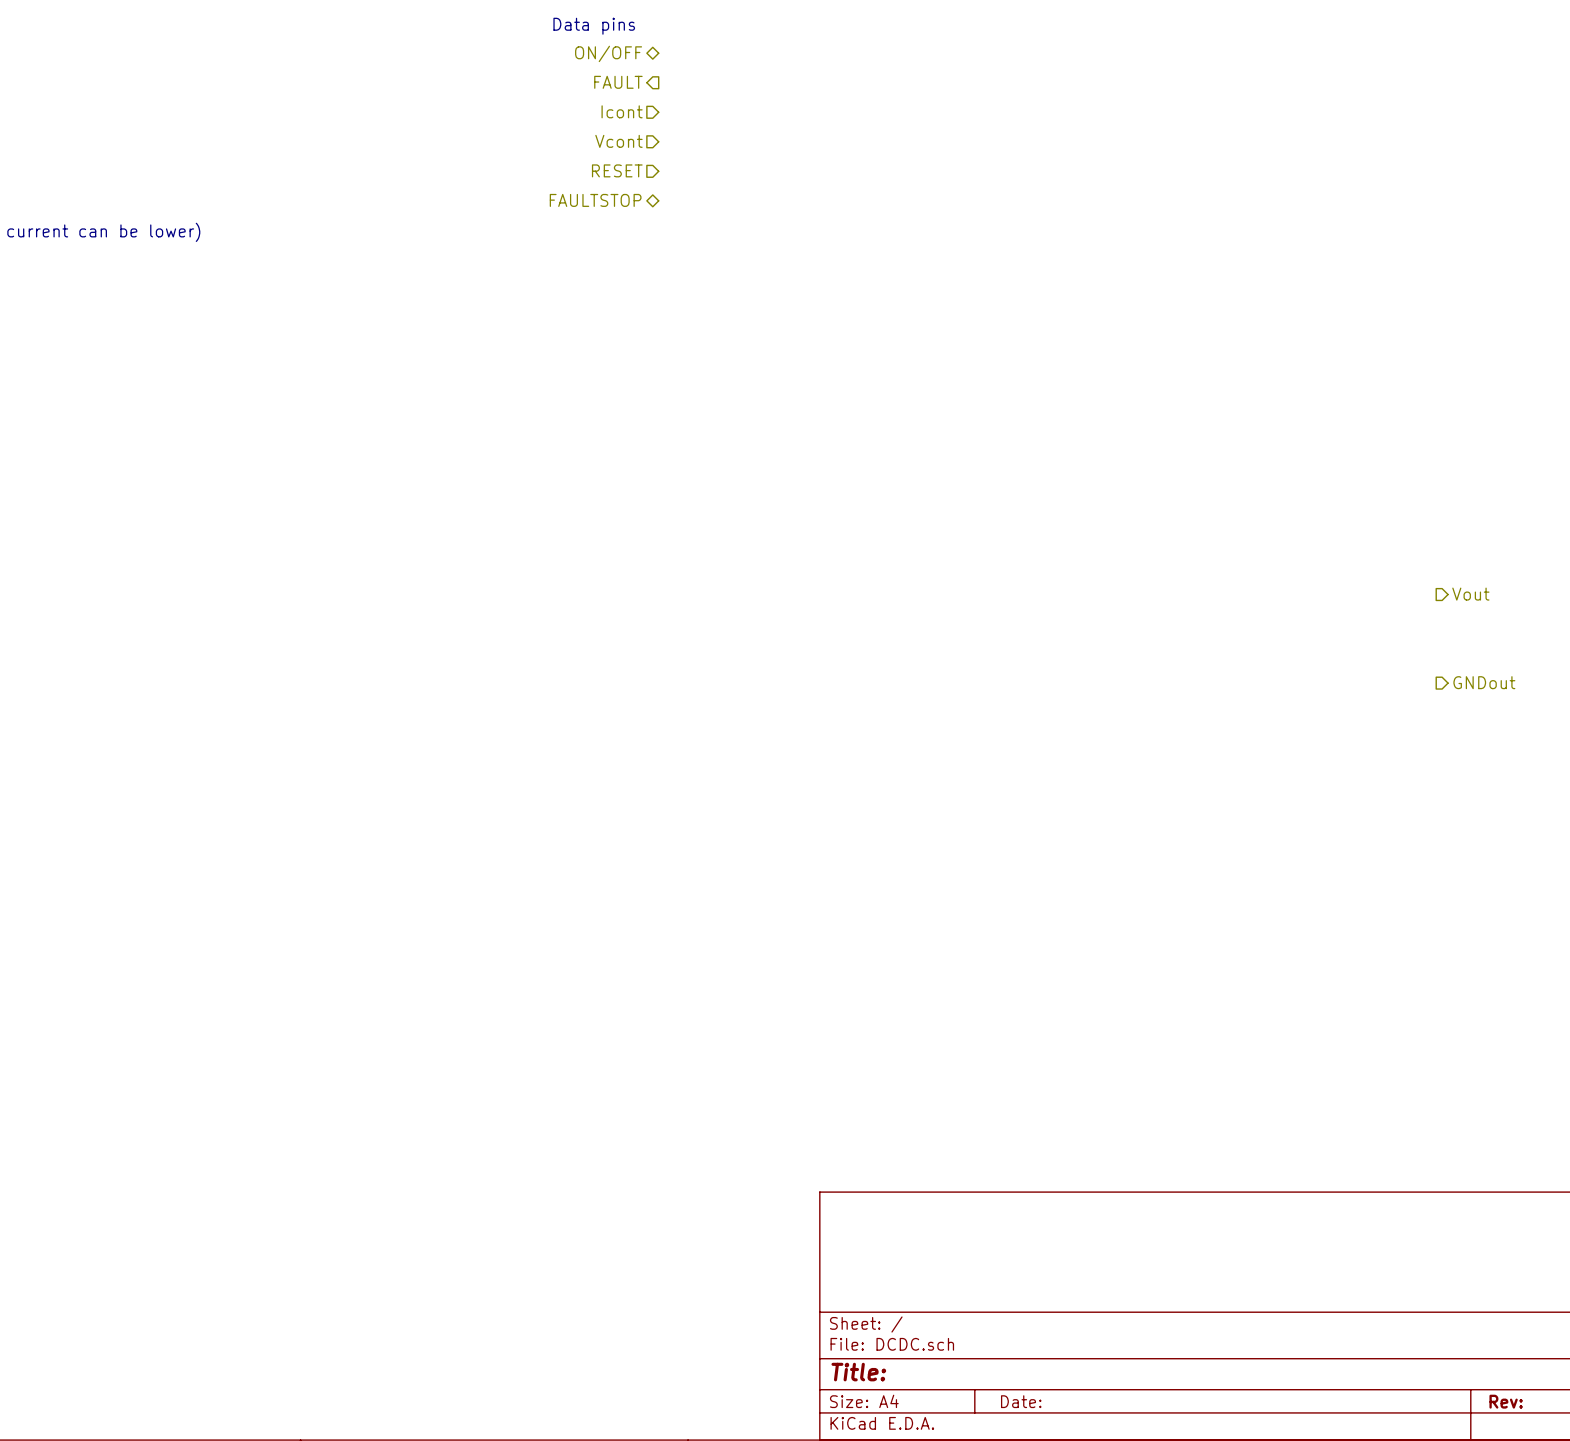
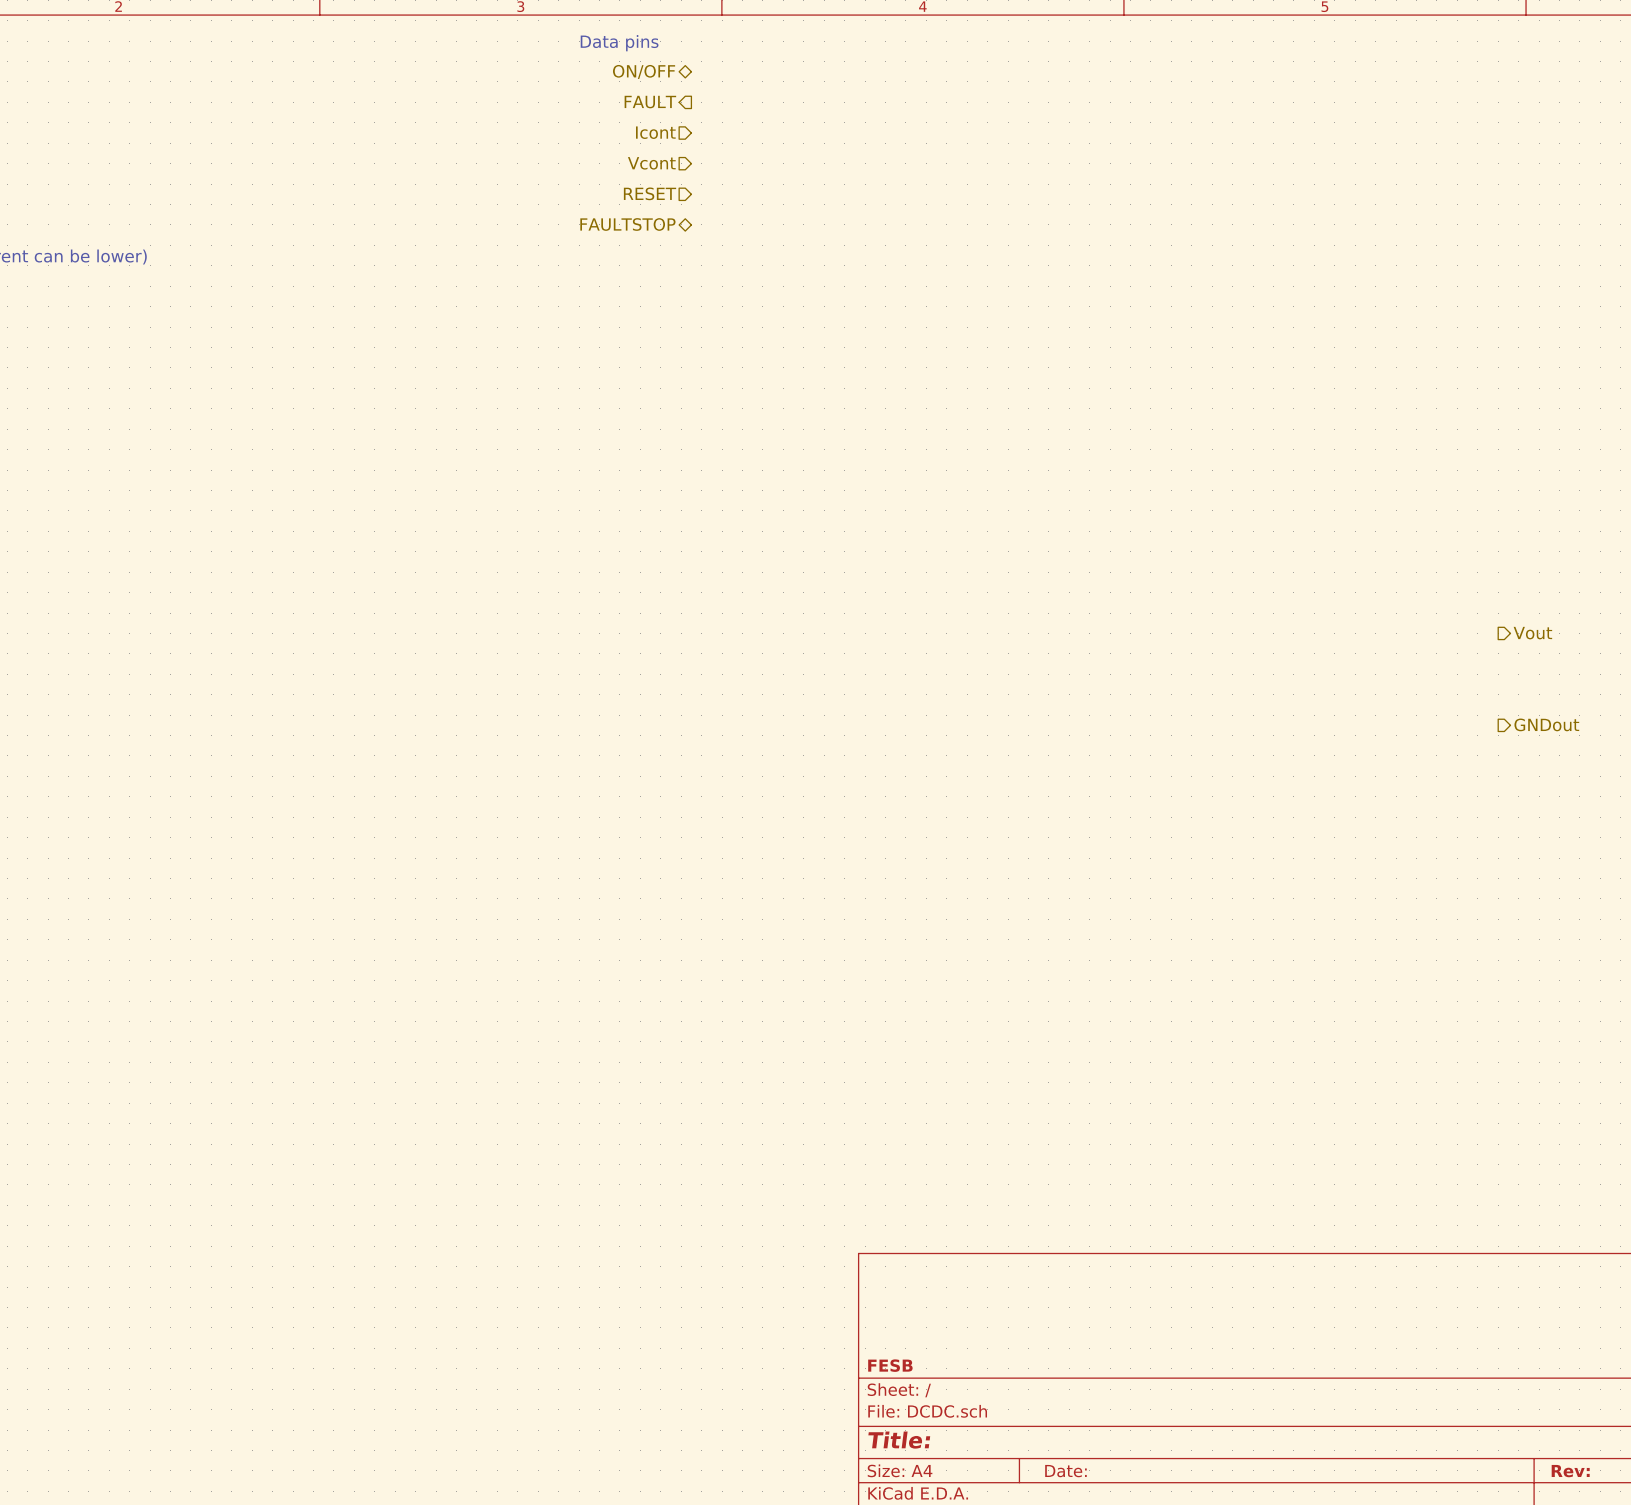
title block: none -> FESB (890, 1365)

